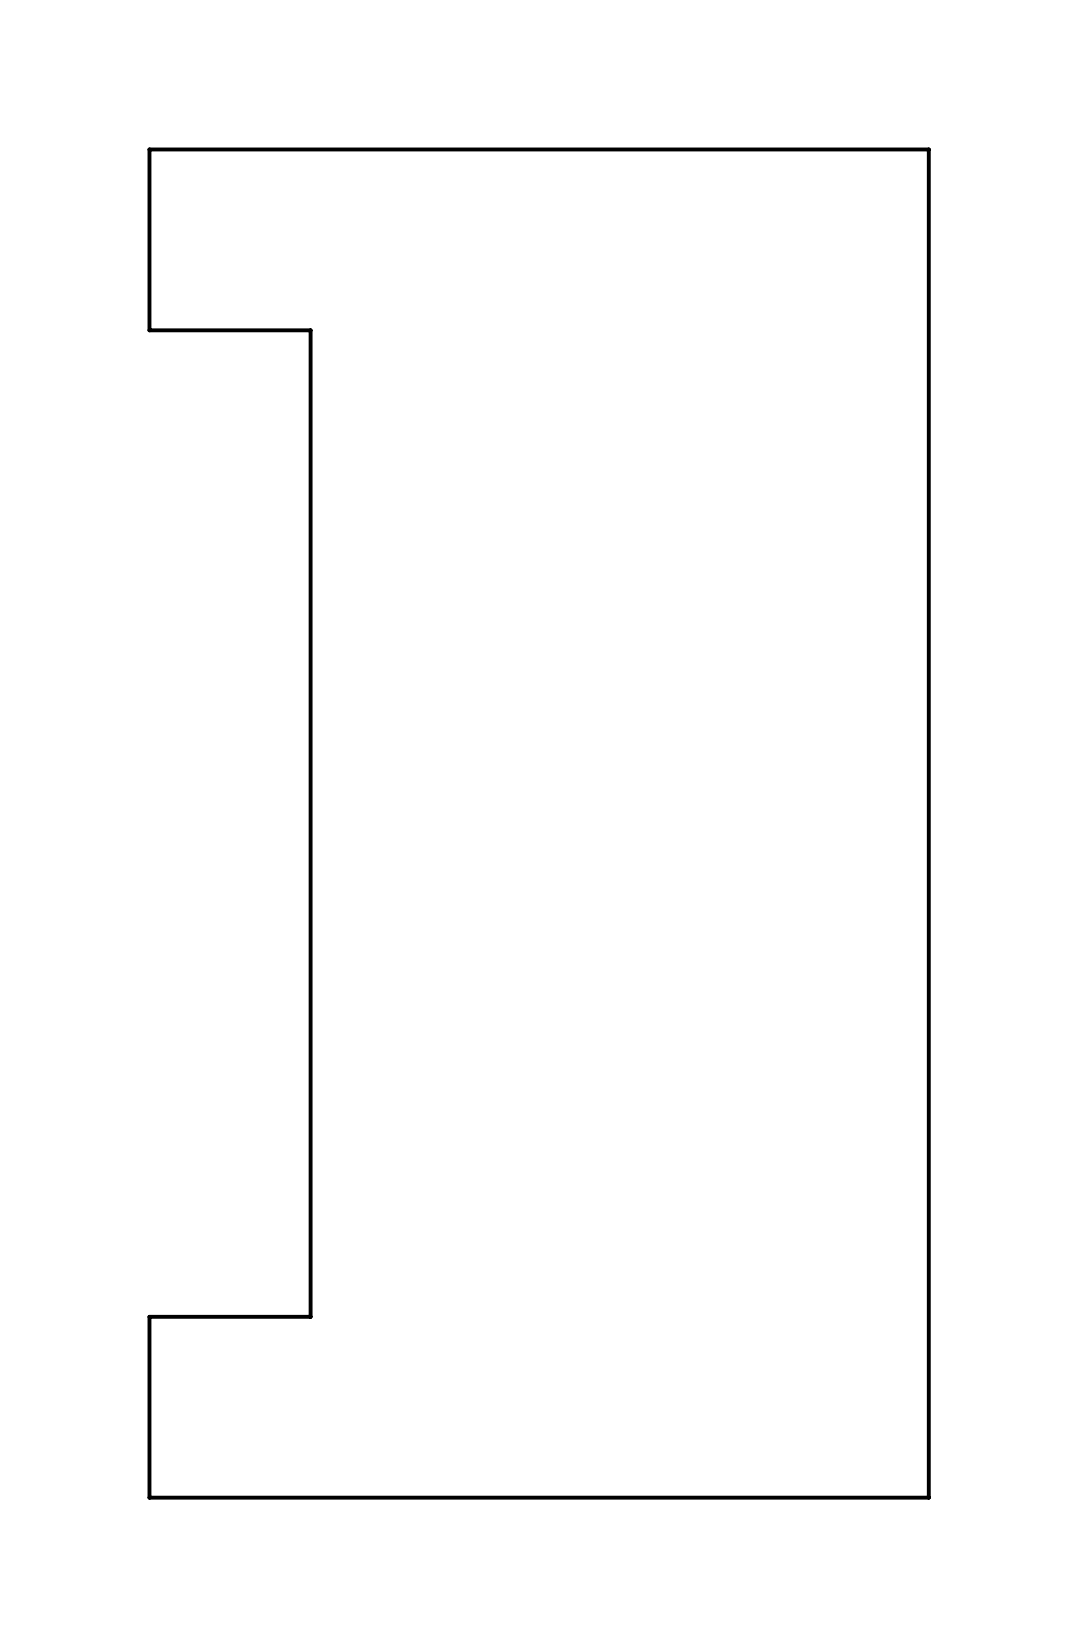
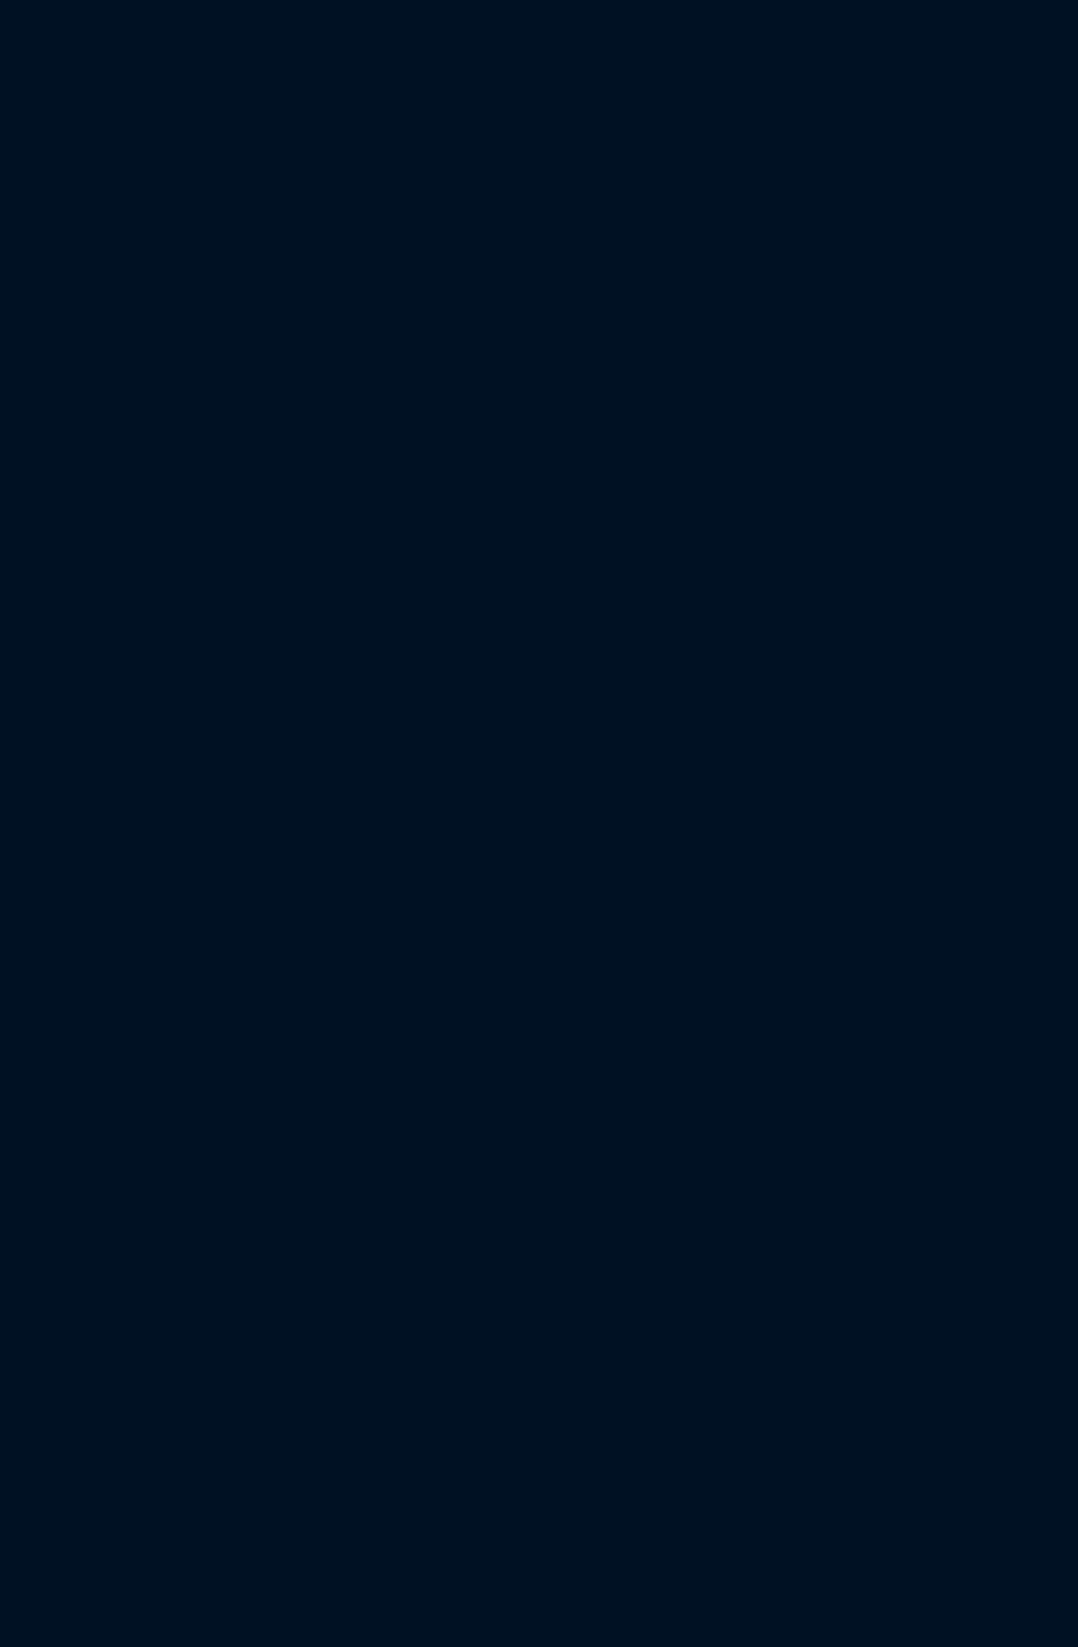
board edge: (928, 149) (149, 149) (149, 330) (310, 330) (310, 1316) (149, 1316) (149, 1497) (928, 1497) (928, 149) -> none

